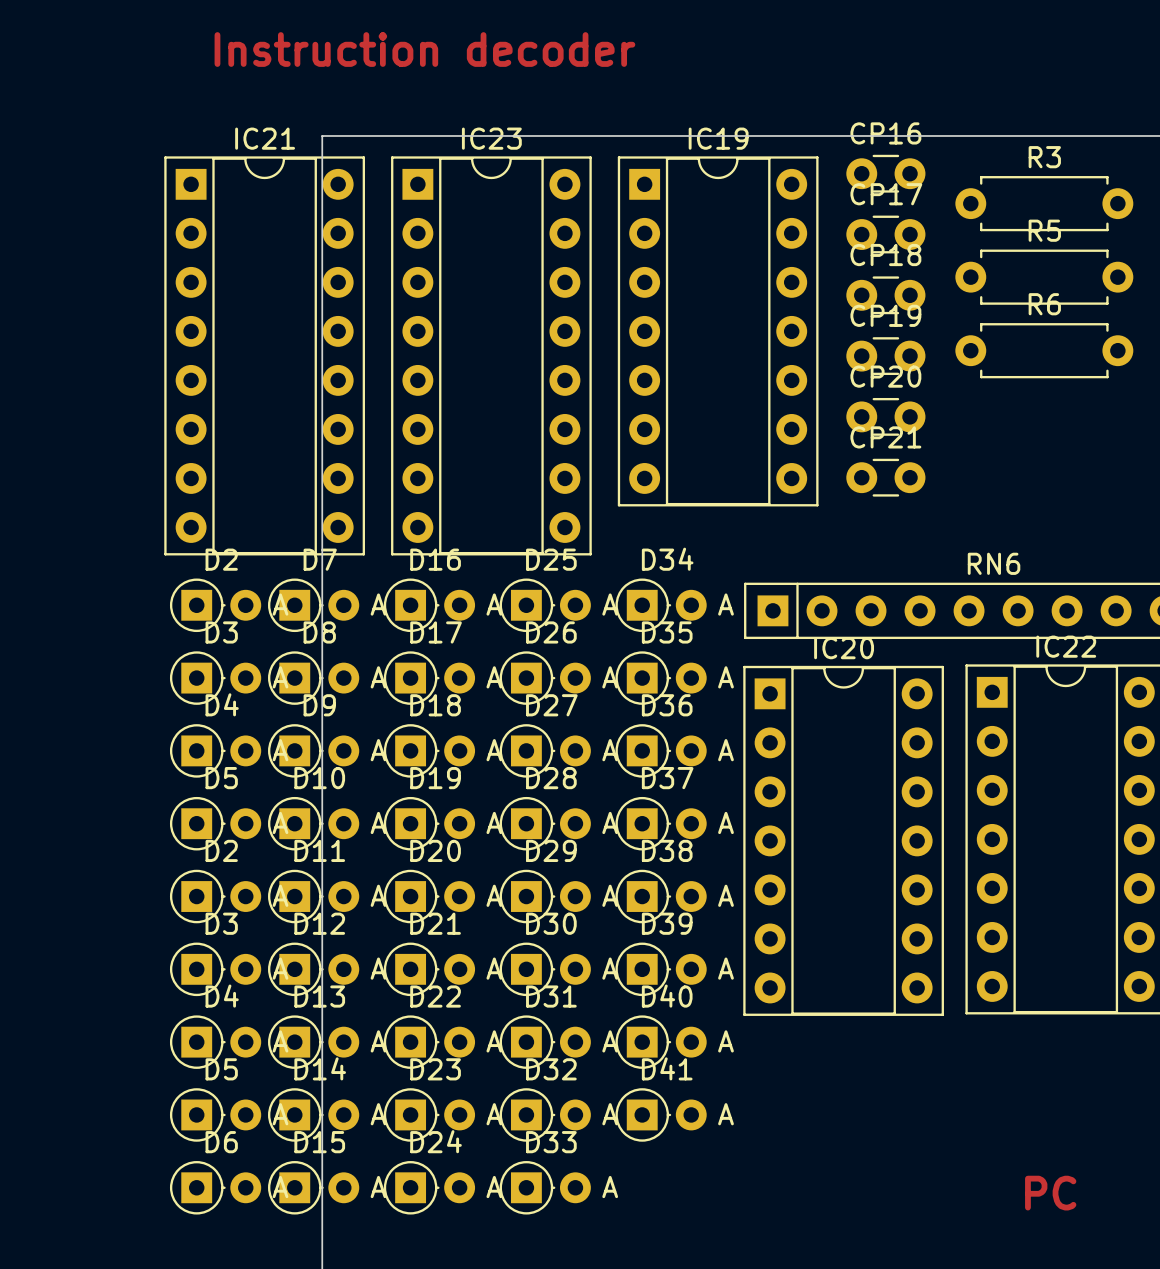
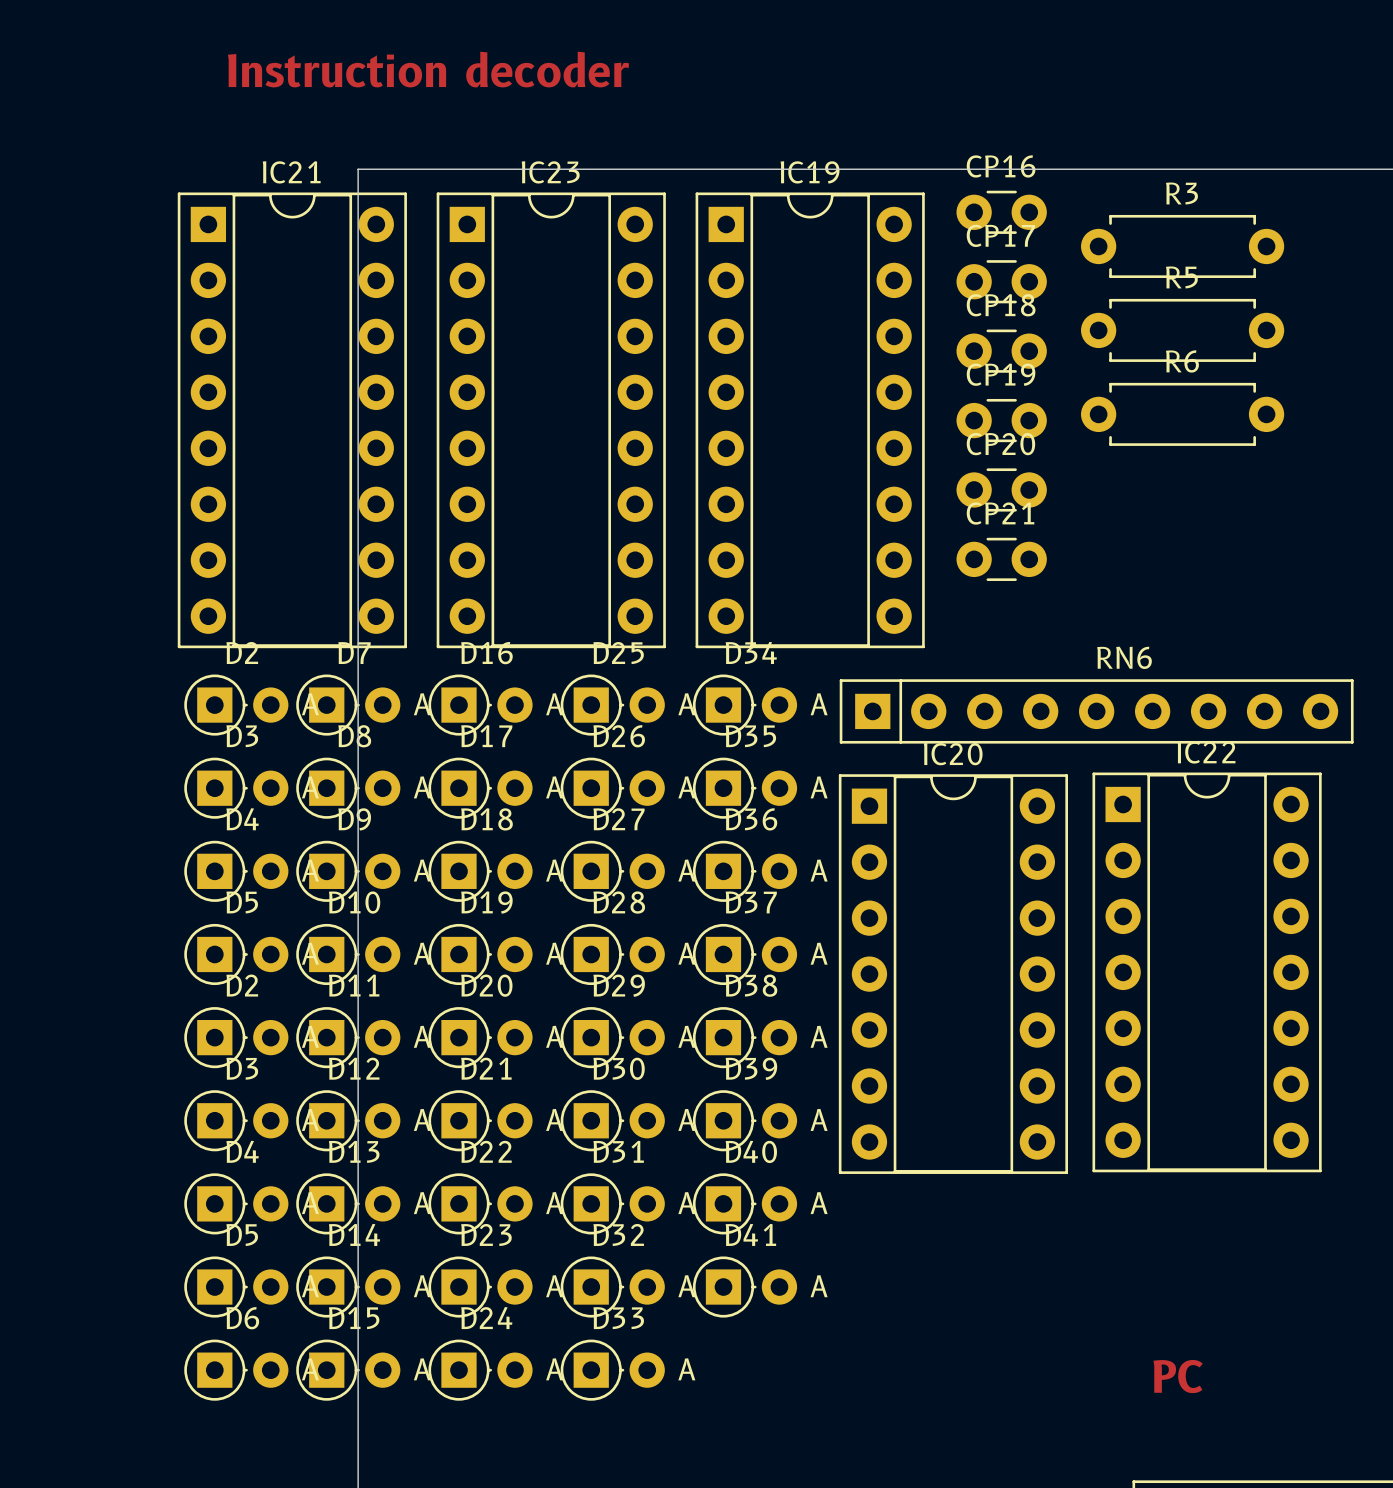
IC19 footprint: [617, 156, 819, 507] -> [695, 192, 925, 649]

